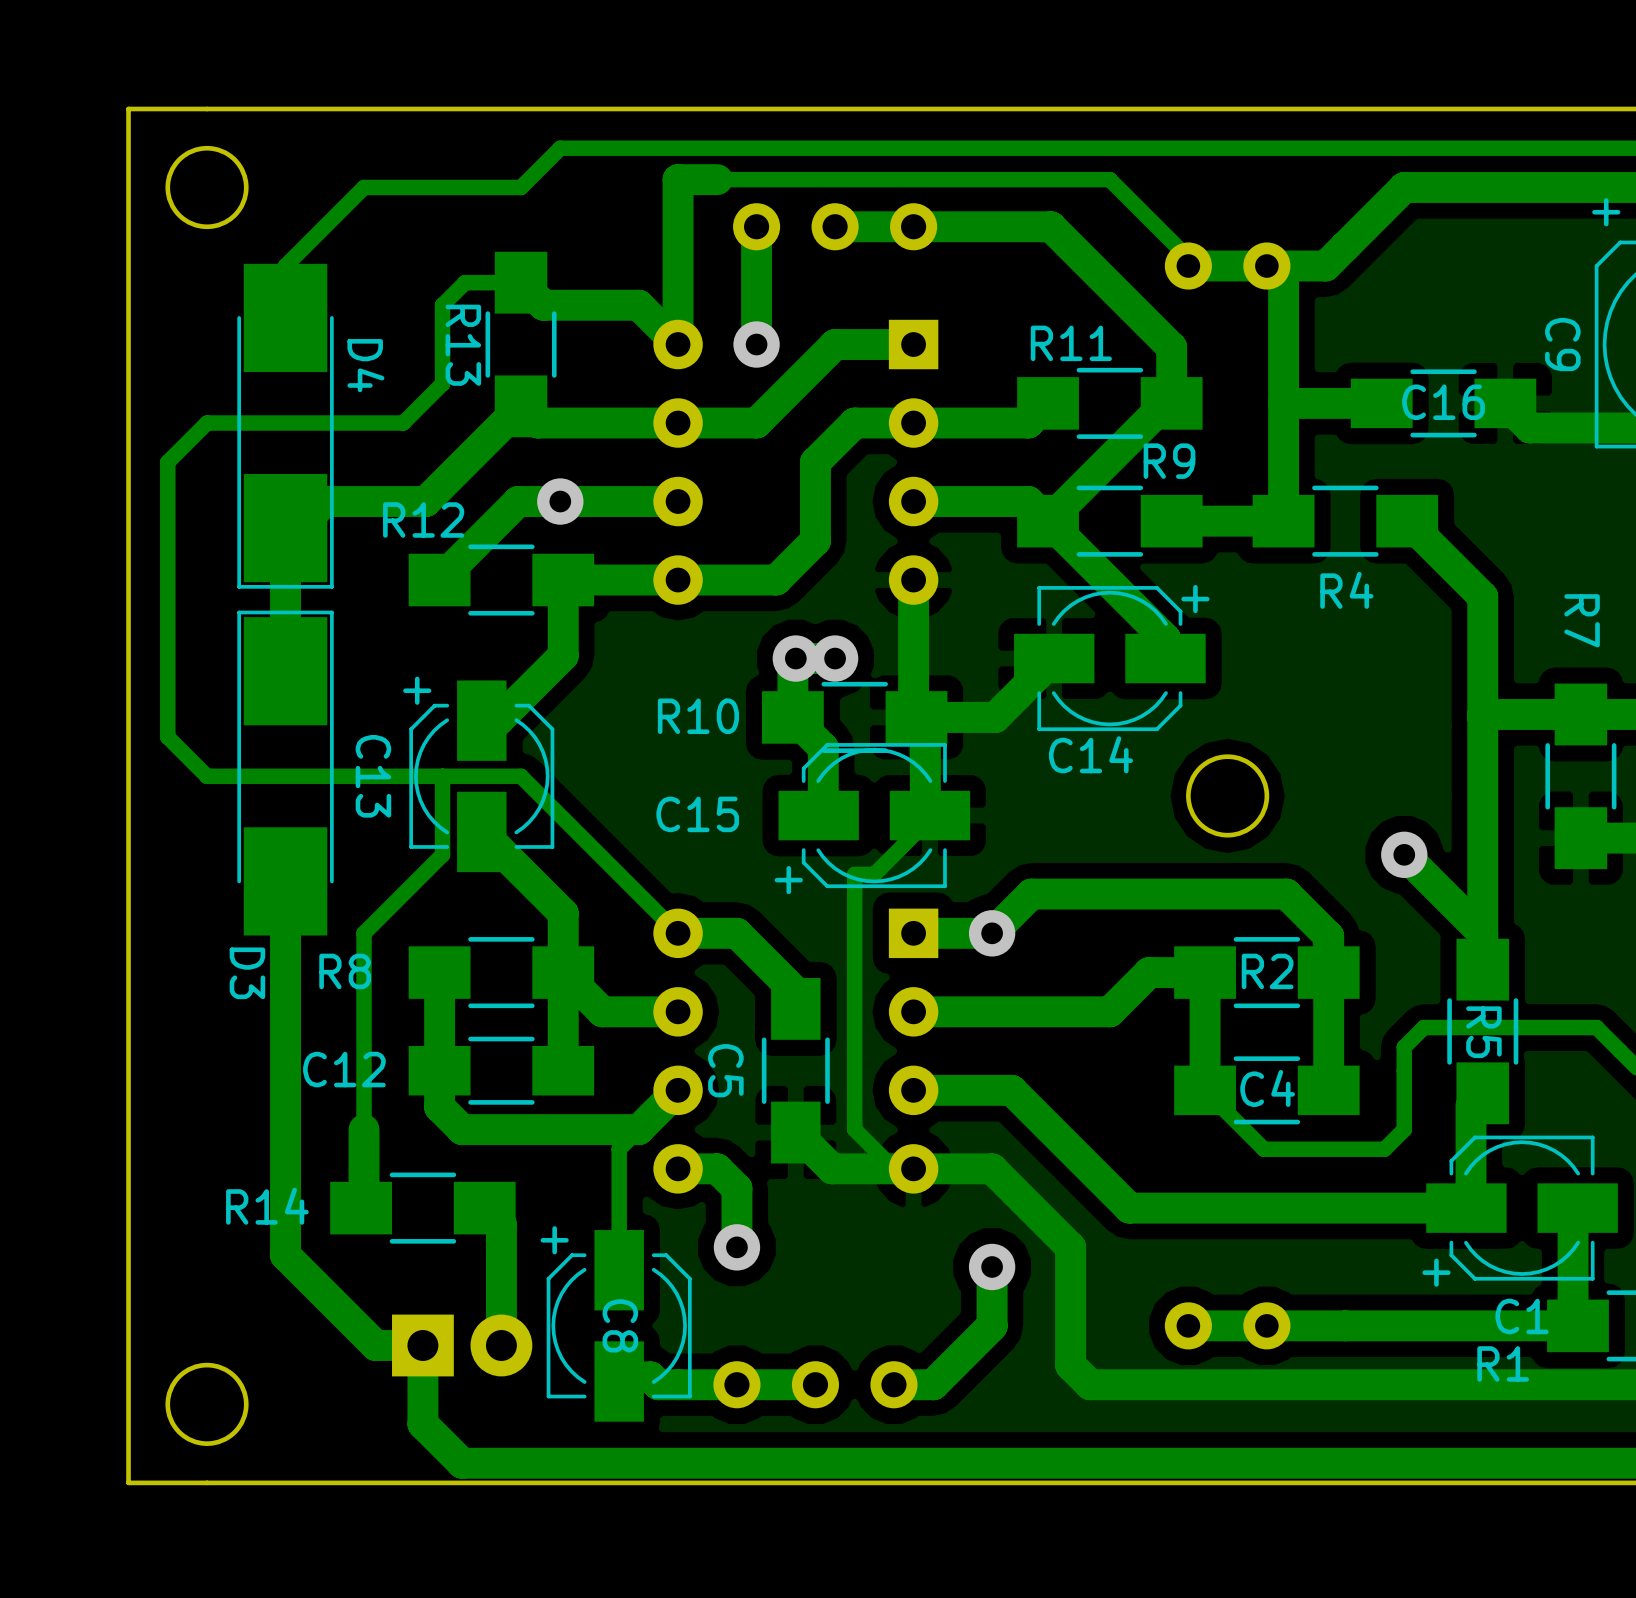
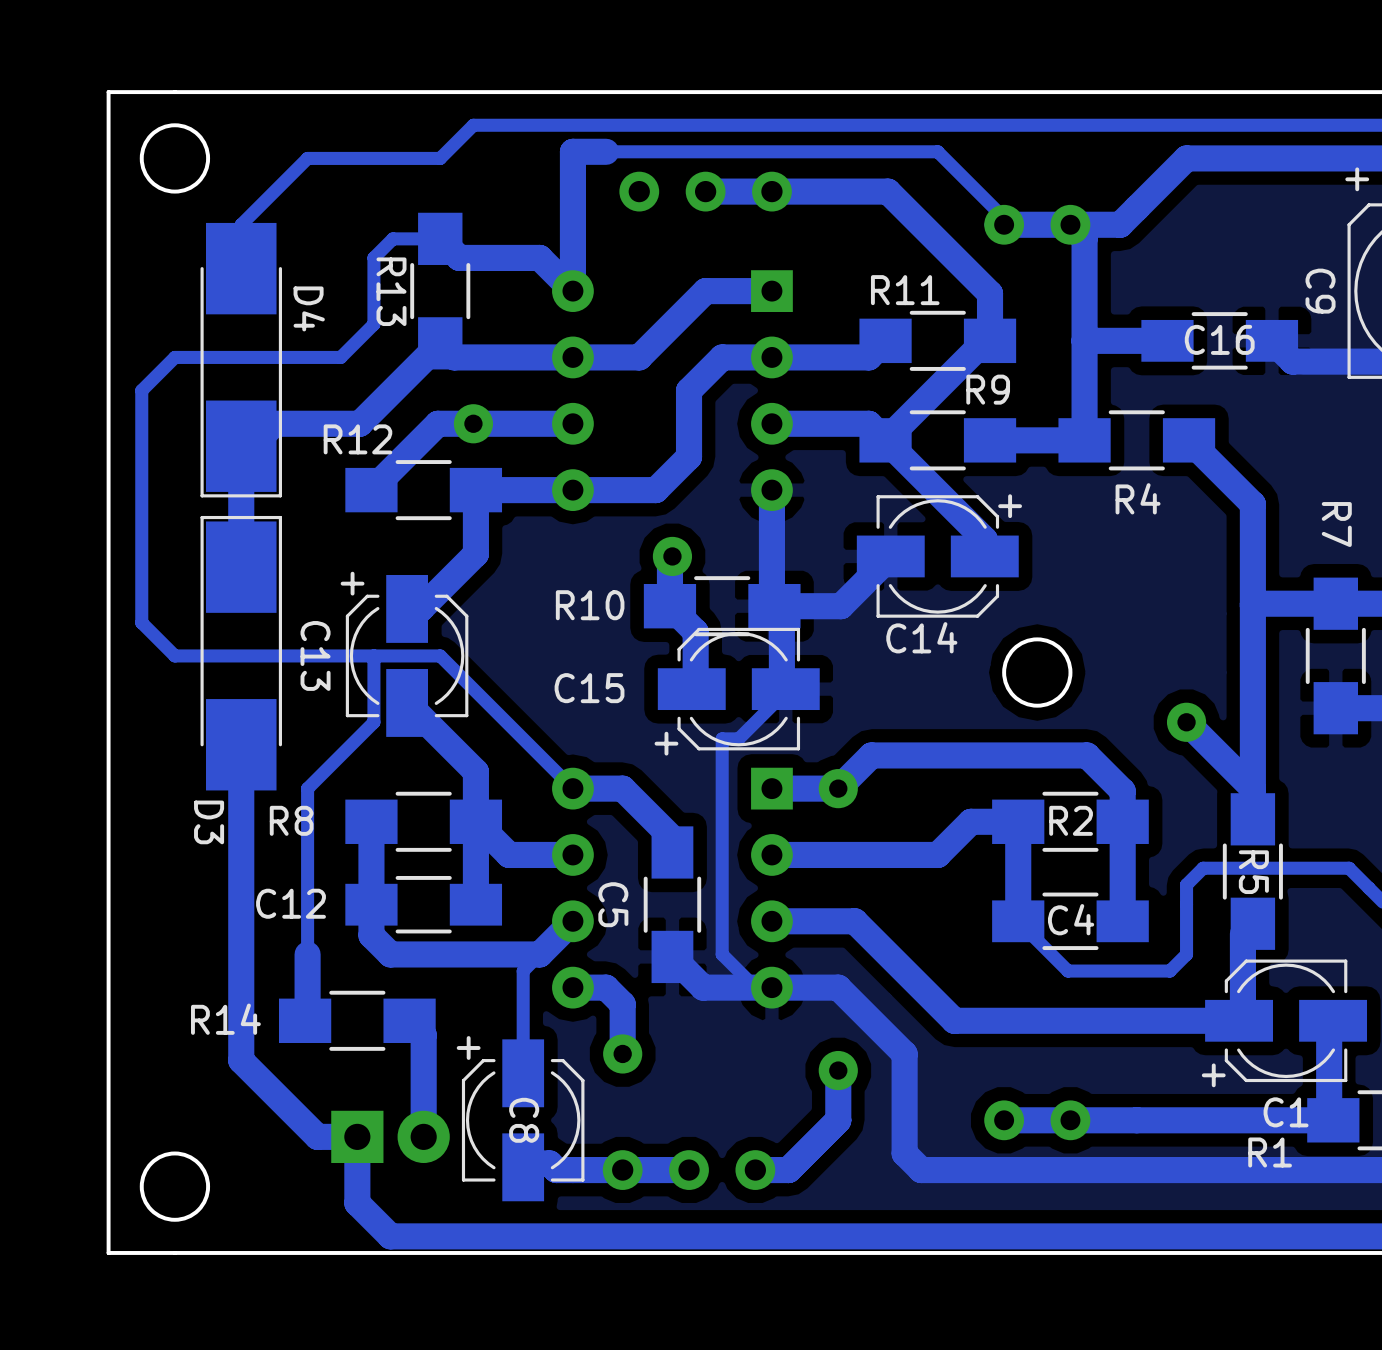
track: (756, 226) (756, 344) -> none
via: (756, 344) -> none
via: (835, 658) -> none

